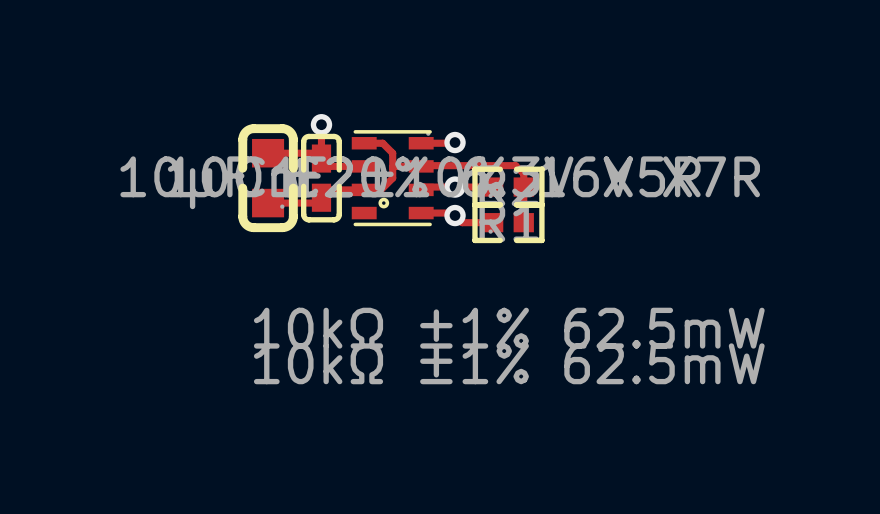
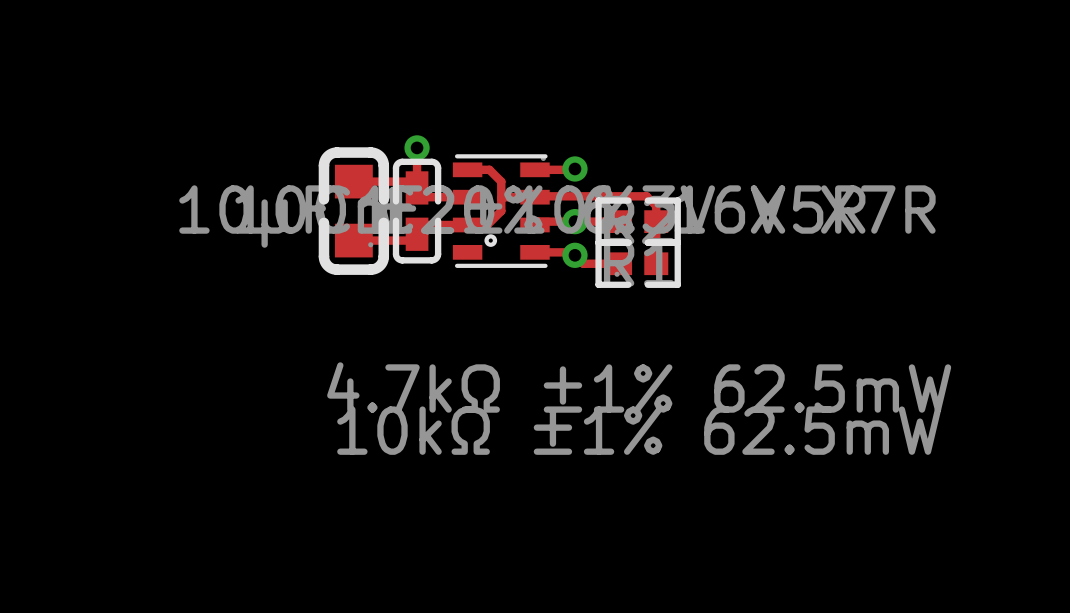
part value: 10kΩ ±1% 62.5mW (509, 328) -> 4.7kΩ ±1% 62.5mW (639, 387)

